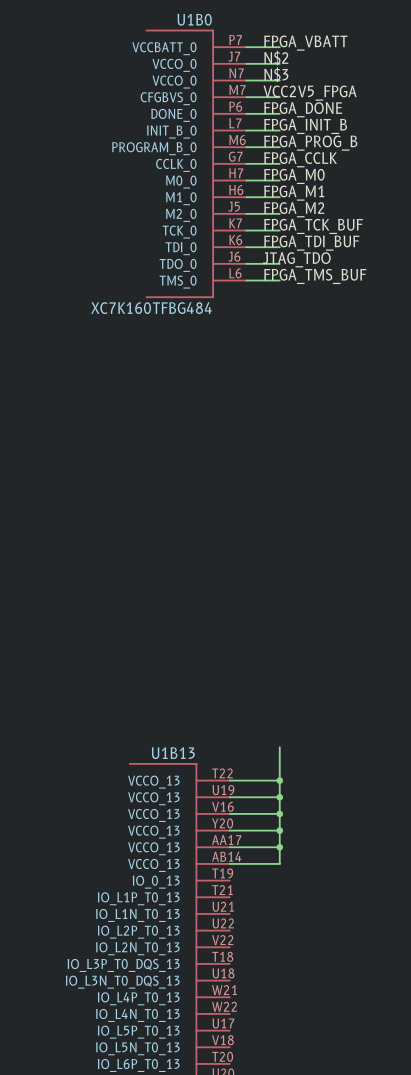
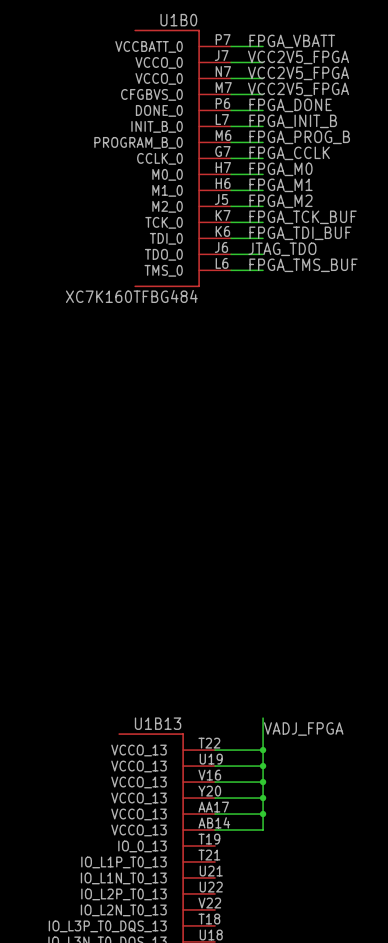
label: N$2 (276, 58) -> VCC2V5_FPGA (298, 57)
label: N$3 (276, 74) -> VCC2V5_FPGA (298, 73)
label: none -> VADJ_FPGA (303, 729)

